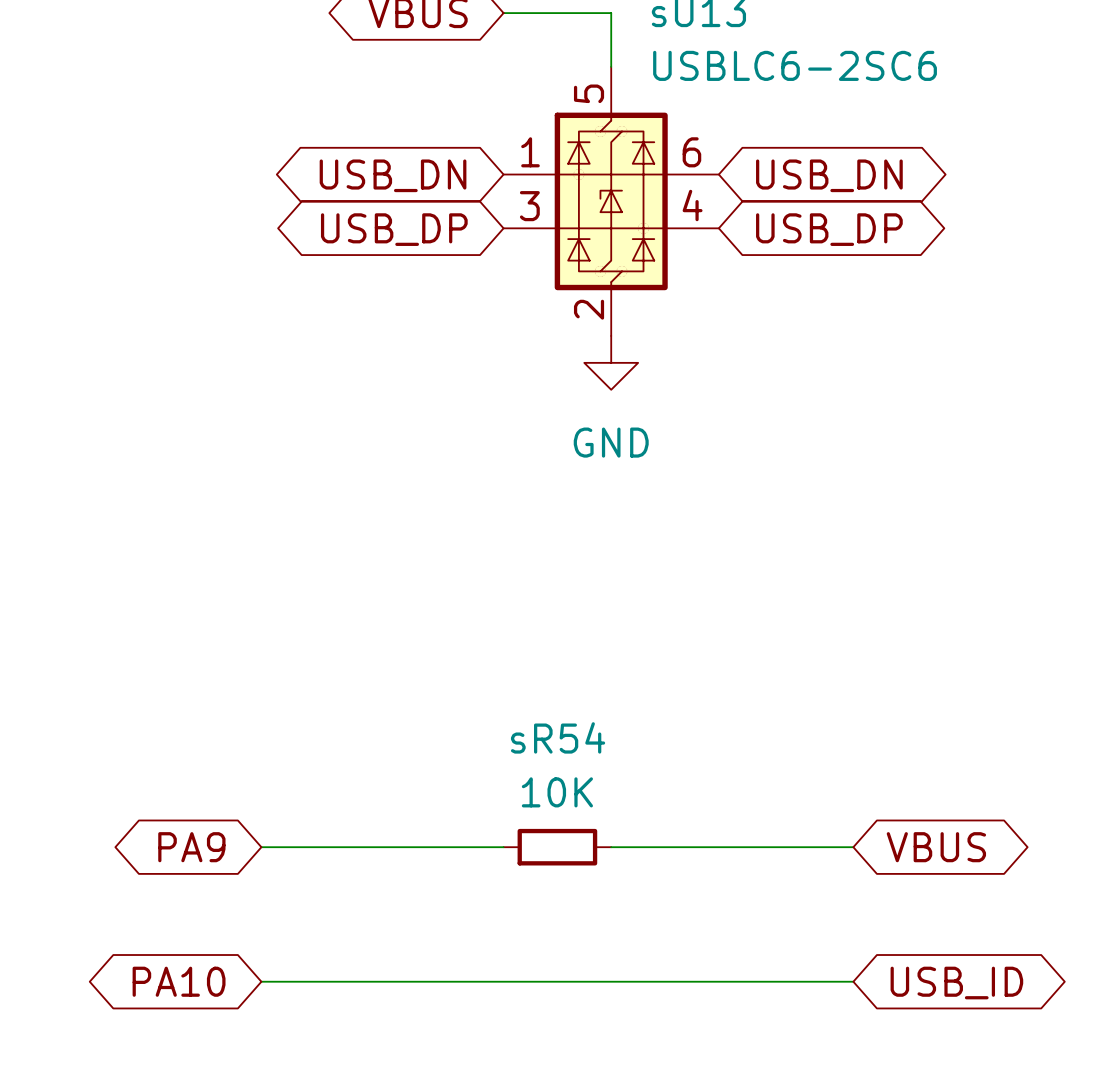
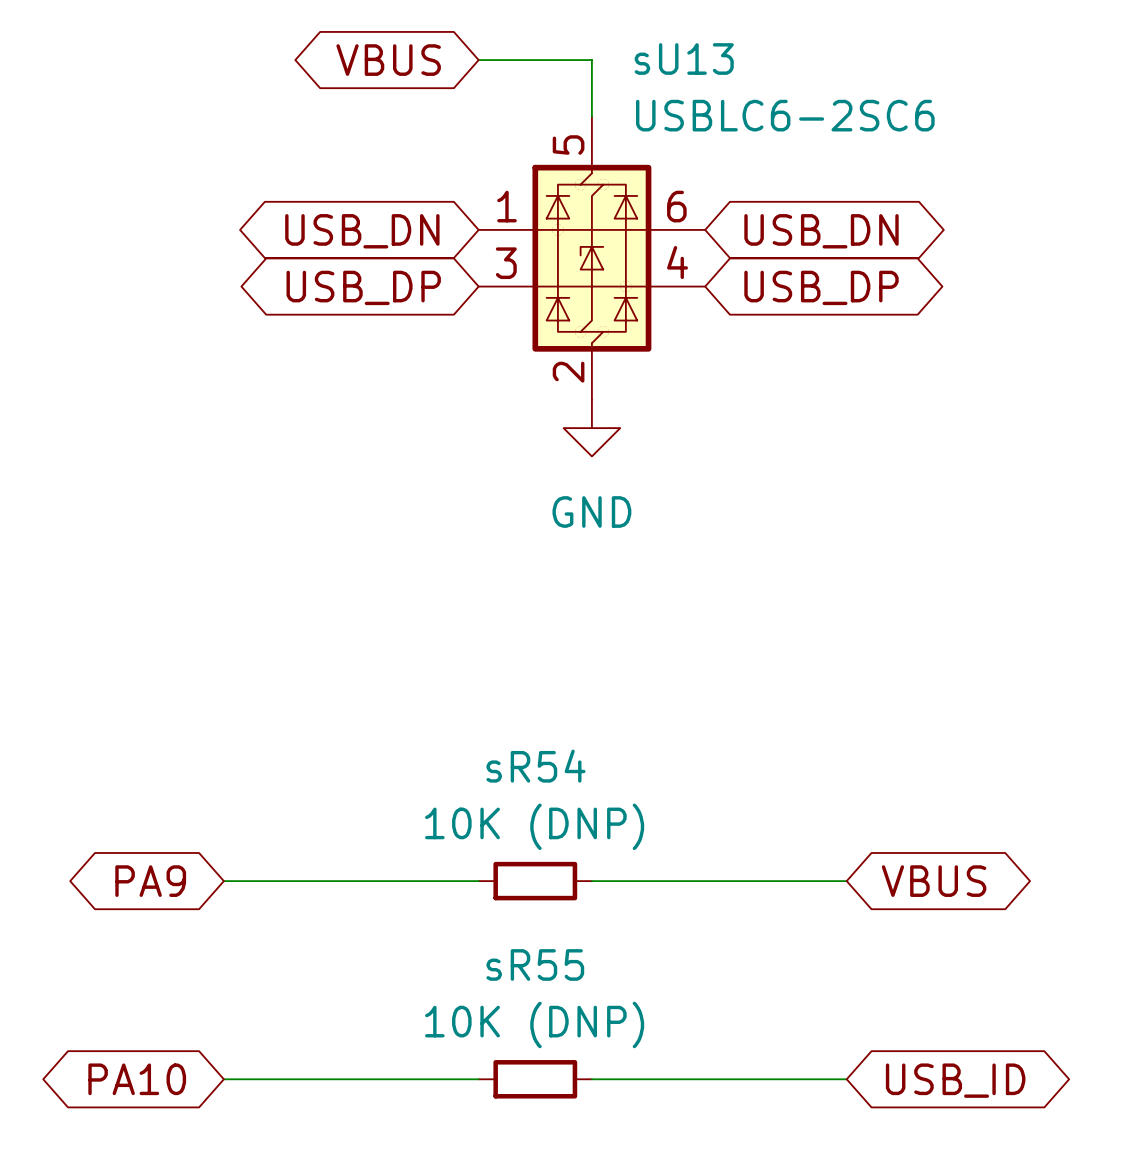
sR54 value: 10K (557, 792) -> 10K (DNP) (534, 826)
global label position: PA9 (191, 847) -> PA9 (150, 881)
wire: (261, 847) (503, 847) -> (223, 881) (478, 881)
sR54 position: (557, 847) -> (535, 881)
wire: (611, 847) (853, 847) -> (591, 881) (846, 881)
global label position: VBUS (936, 847) -> VBUS (934, 881)
wire: (503, 981) (611, 981) -> none
sR55: none -> 10K (DNP) (535, 1079)

